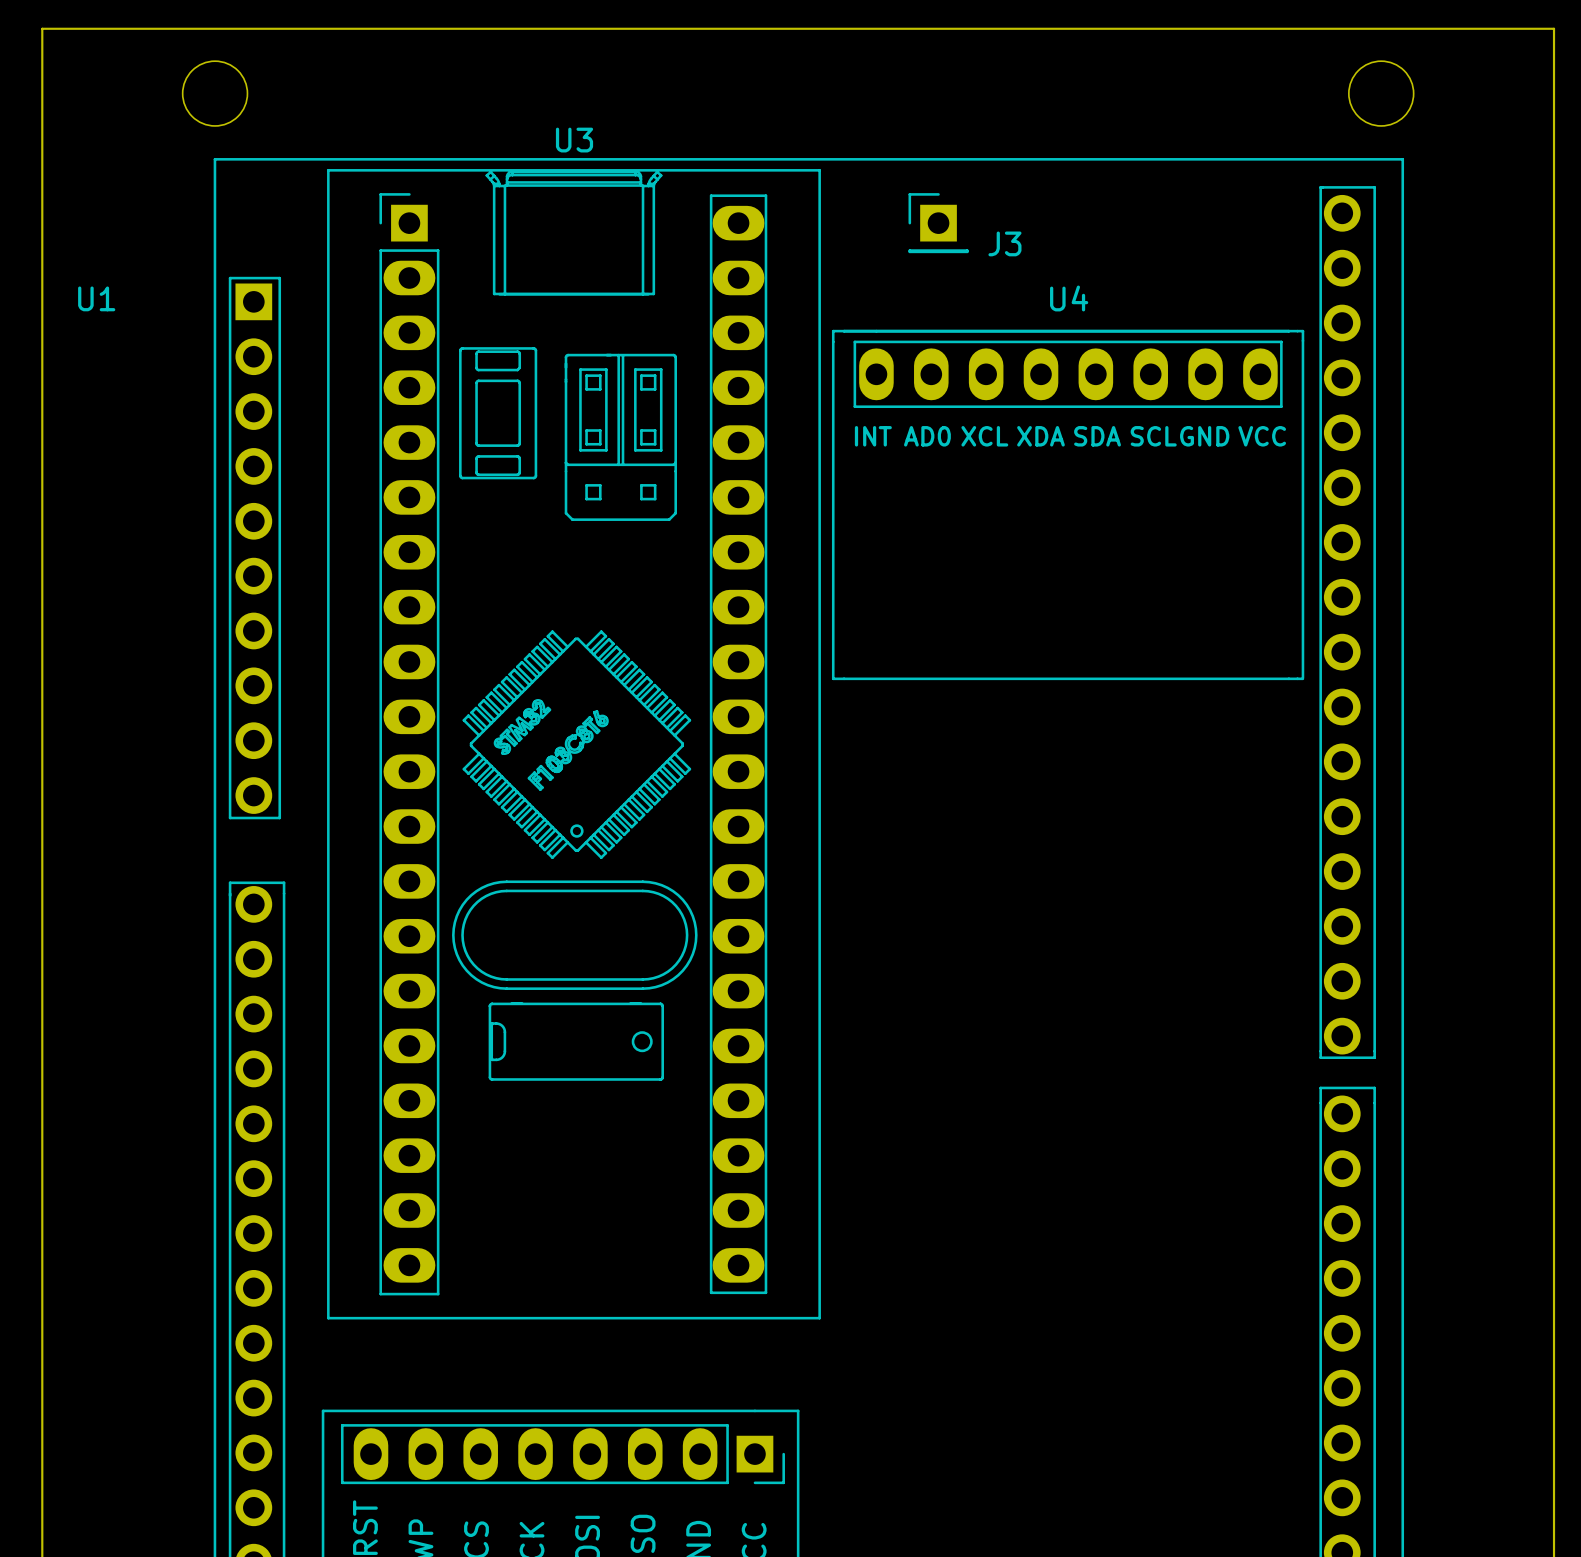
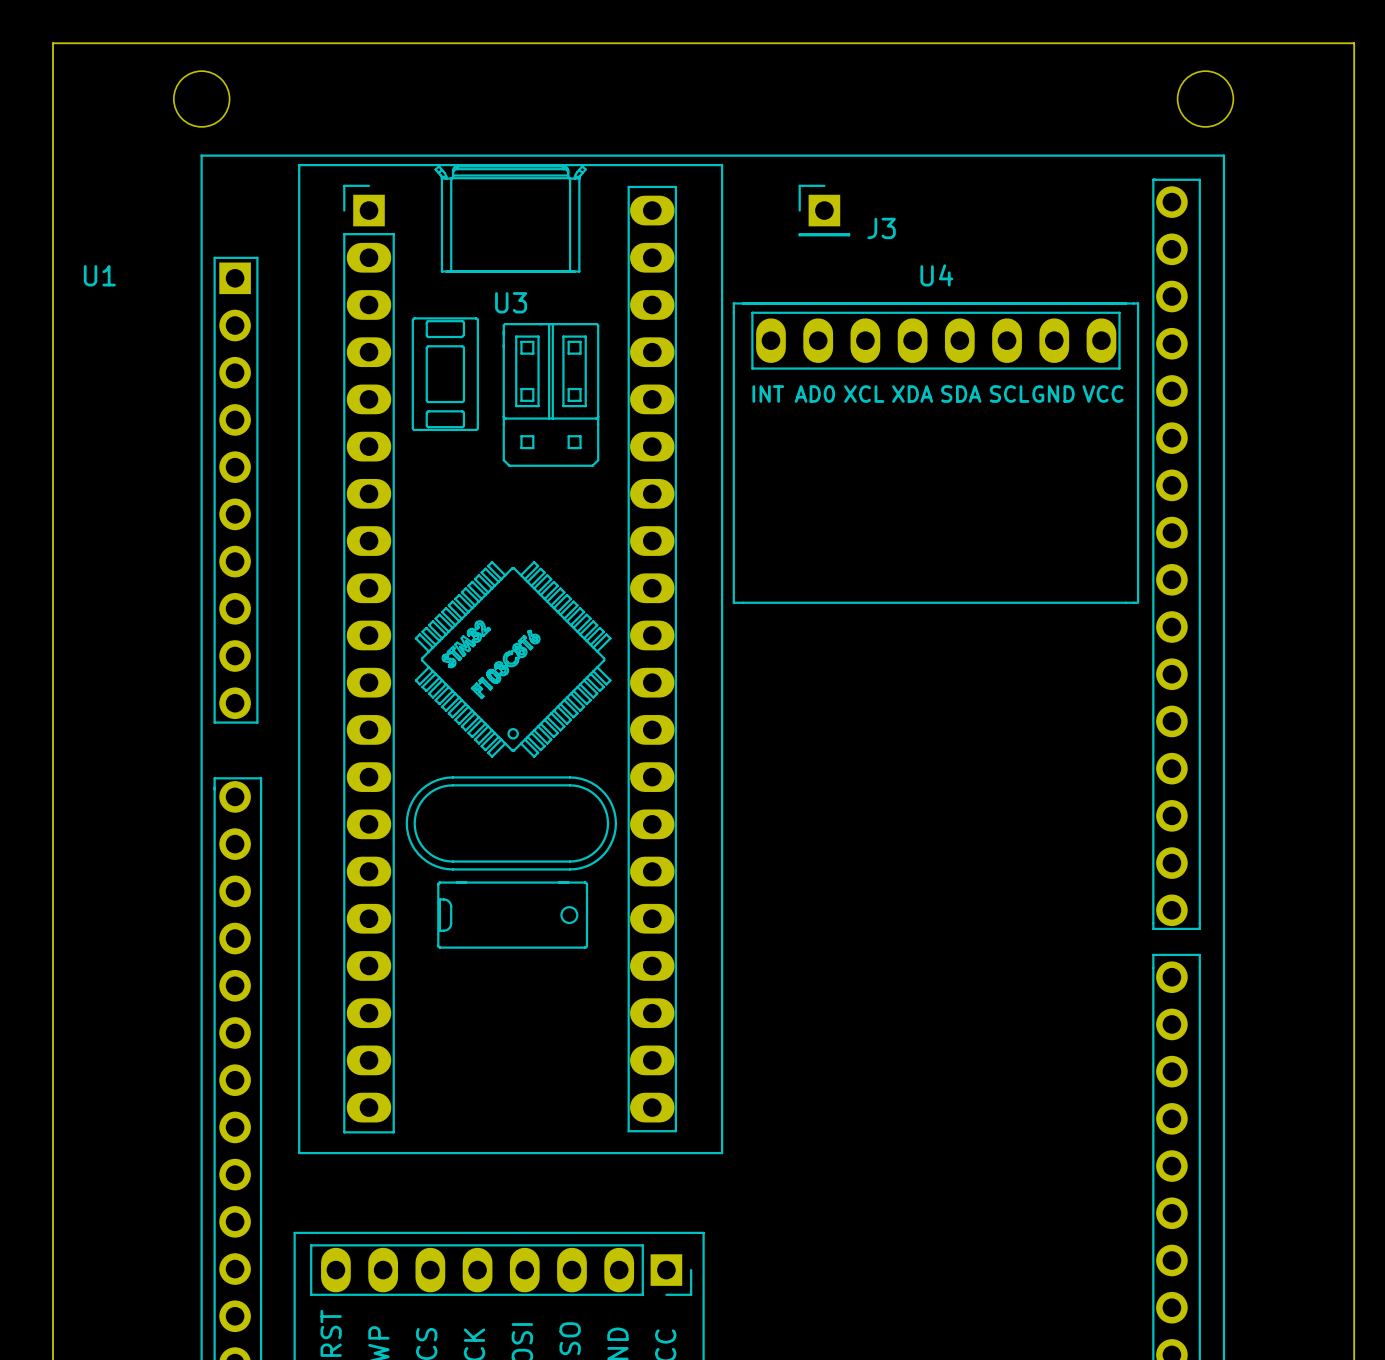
U3 name position: U3 (574, 140) -> U3 (511, 302)

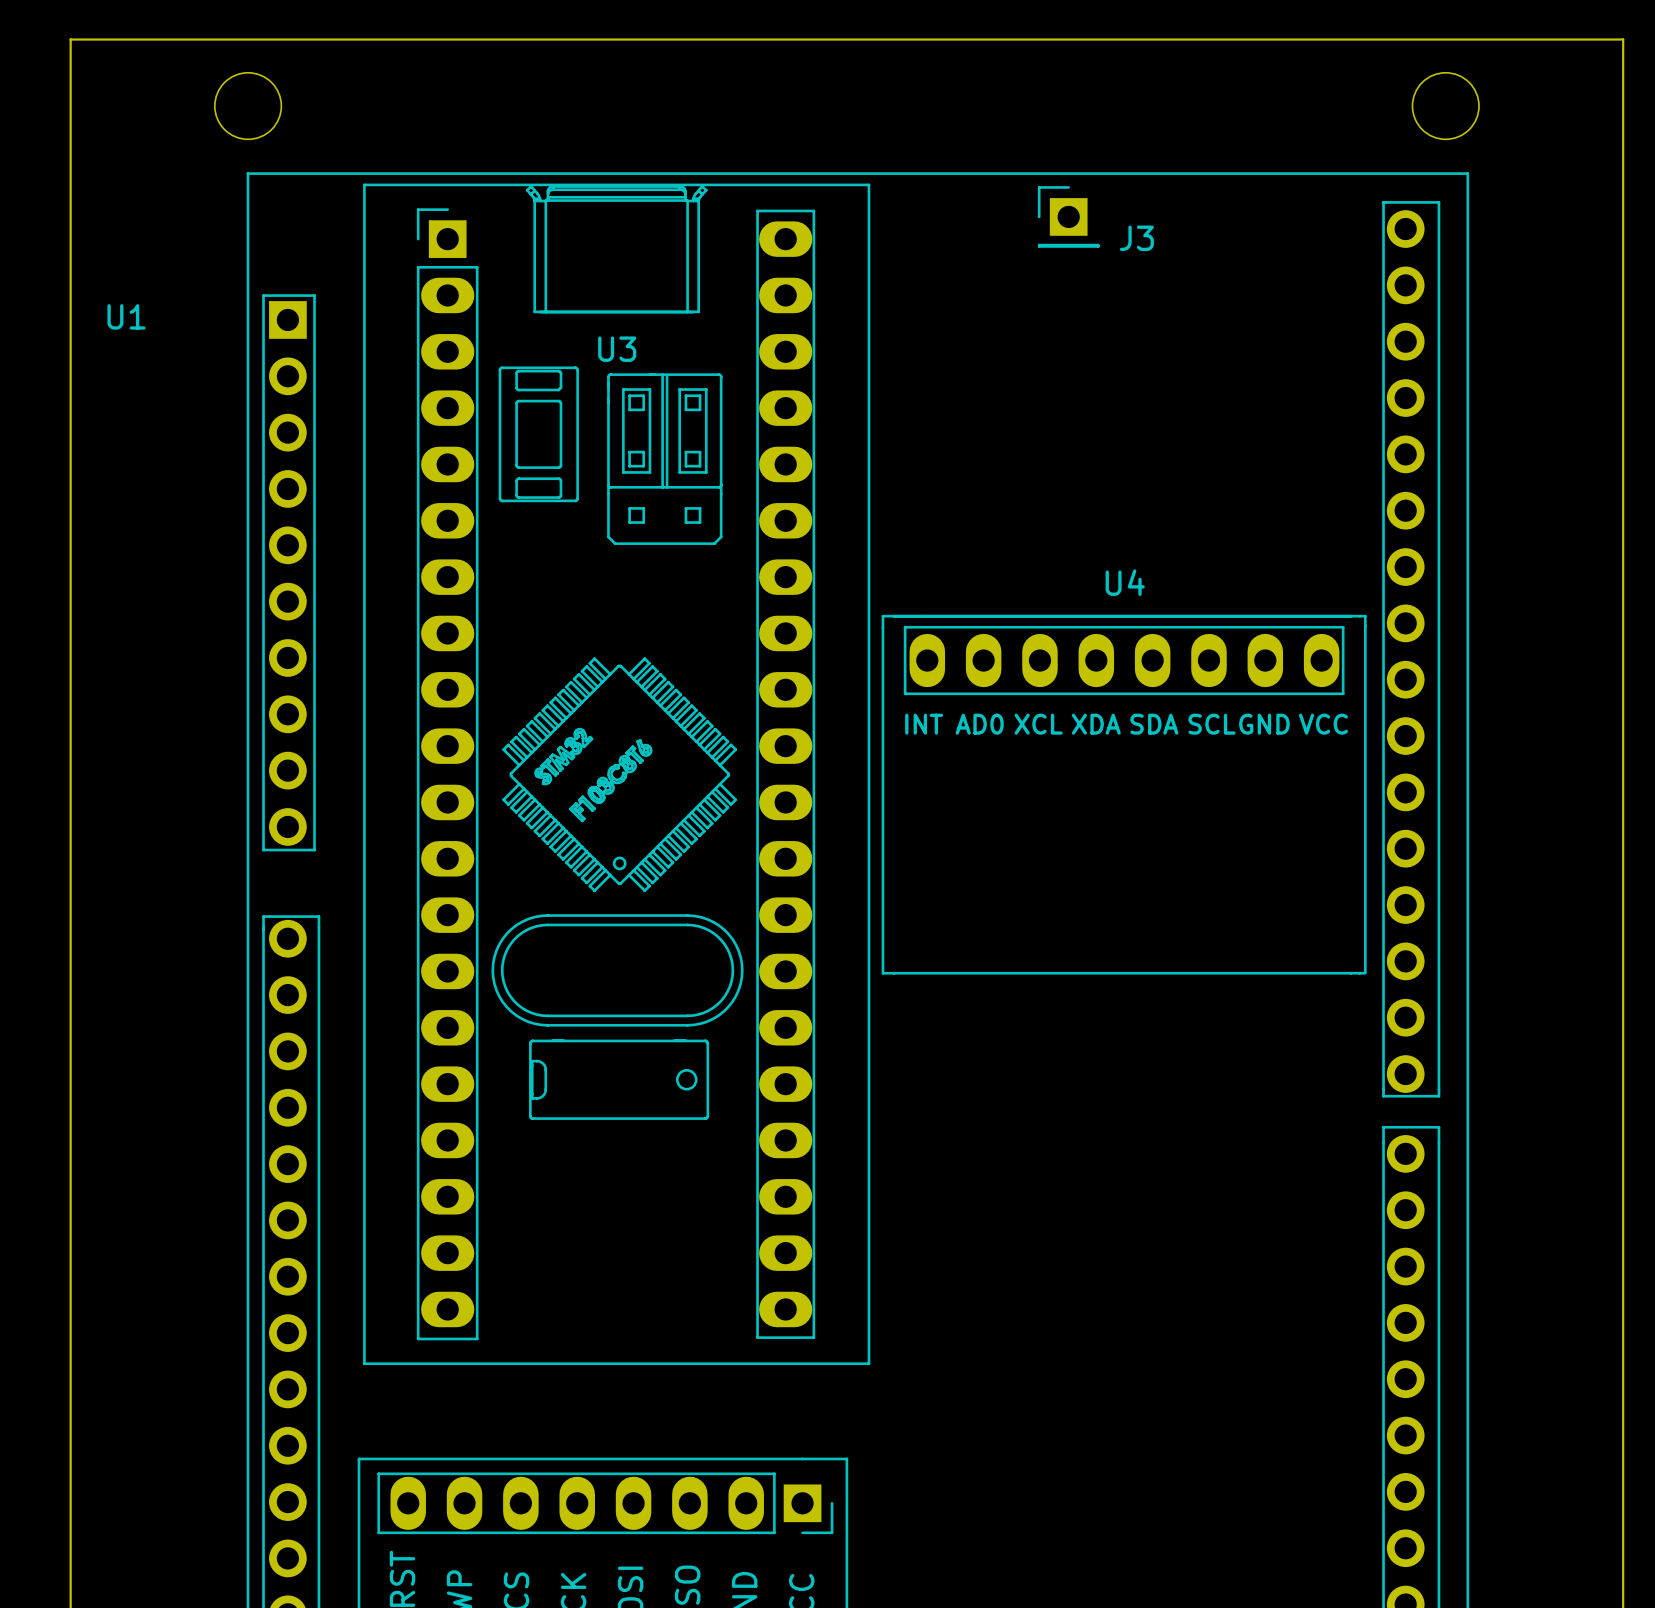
J3 position: (824, 210) -> (1068, 216)
U4 position: (935, 453) -> (1124, 794)

